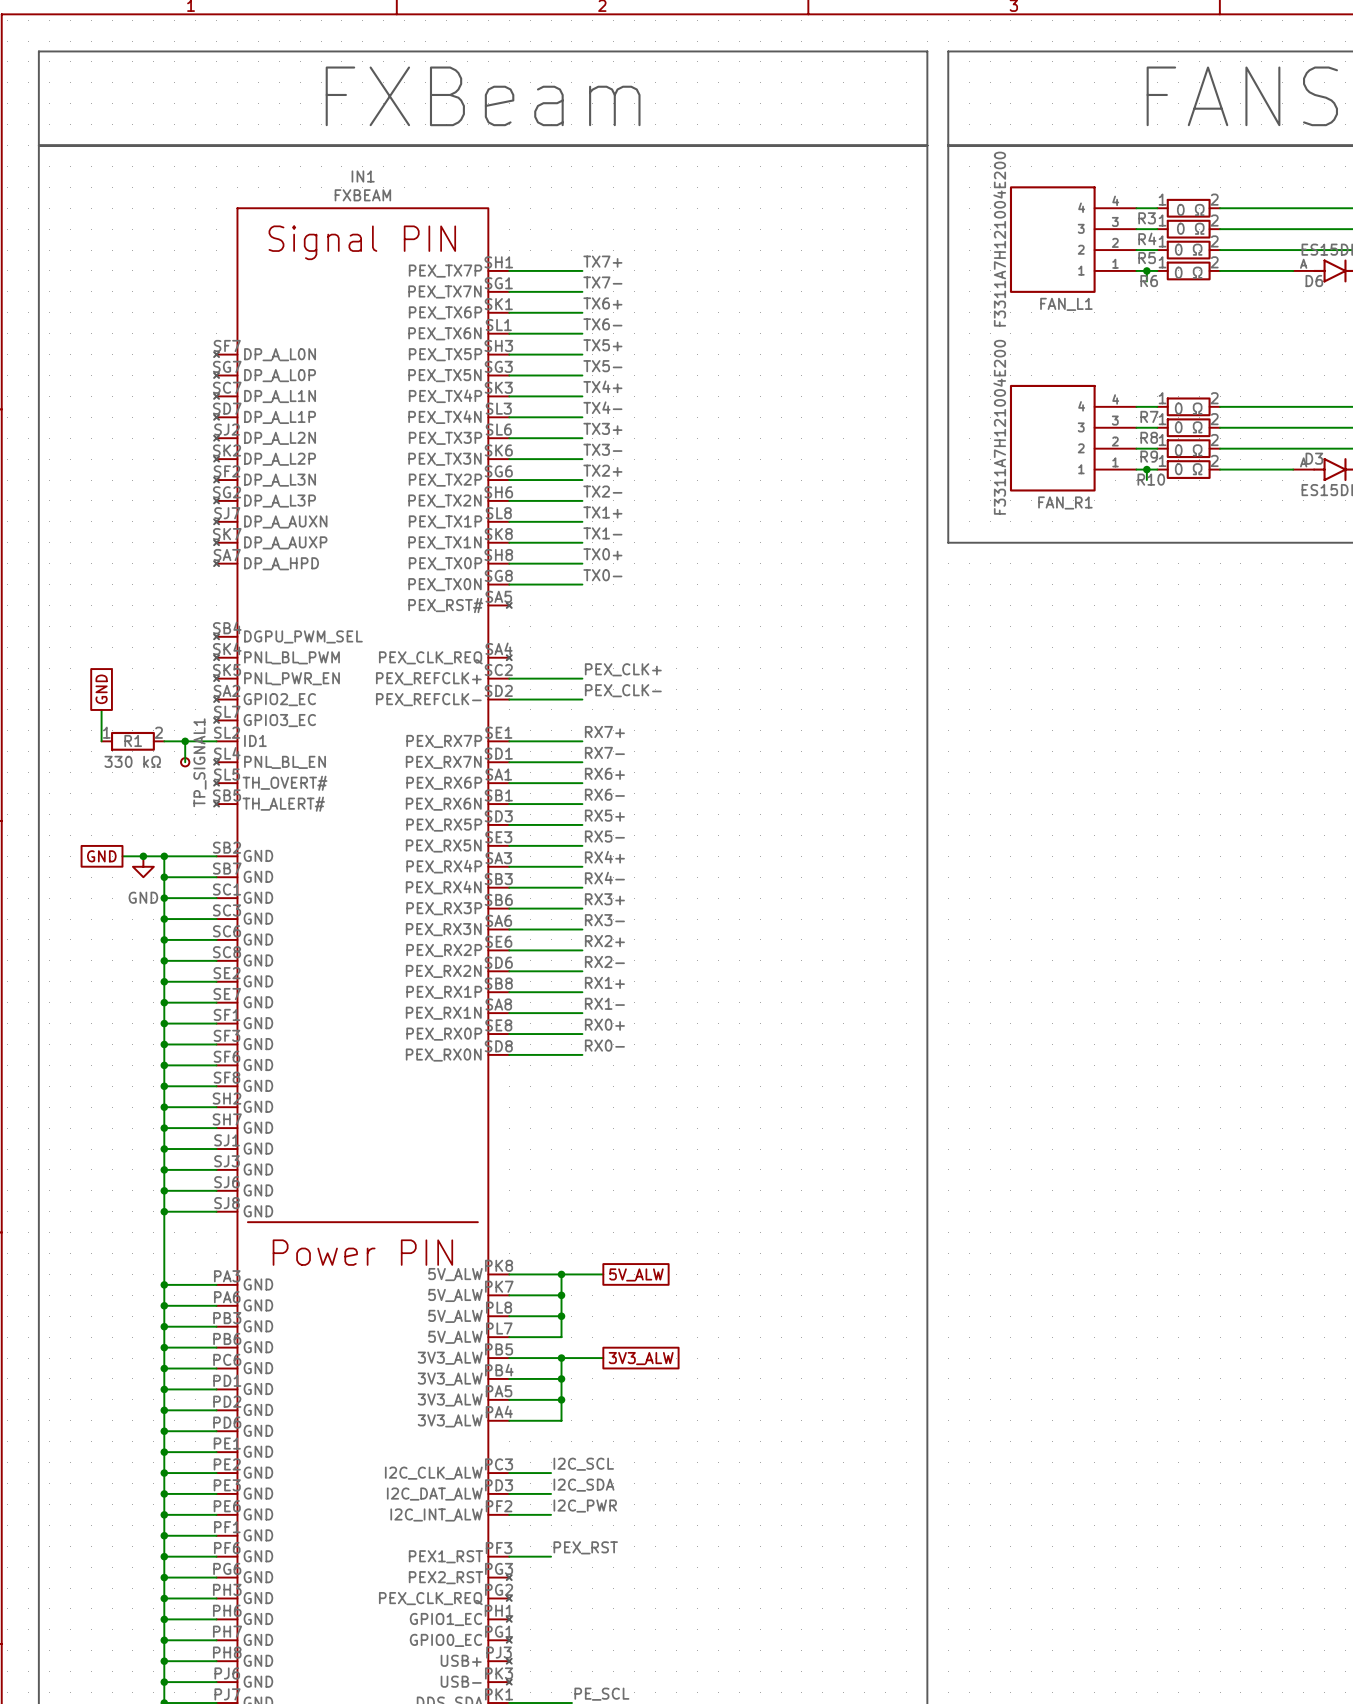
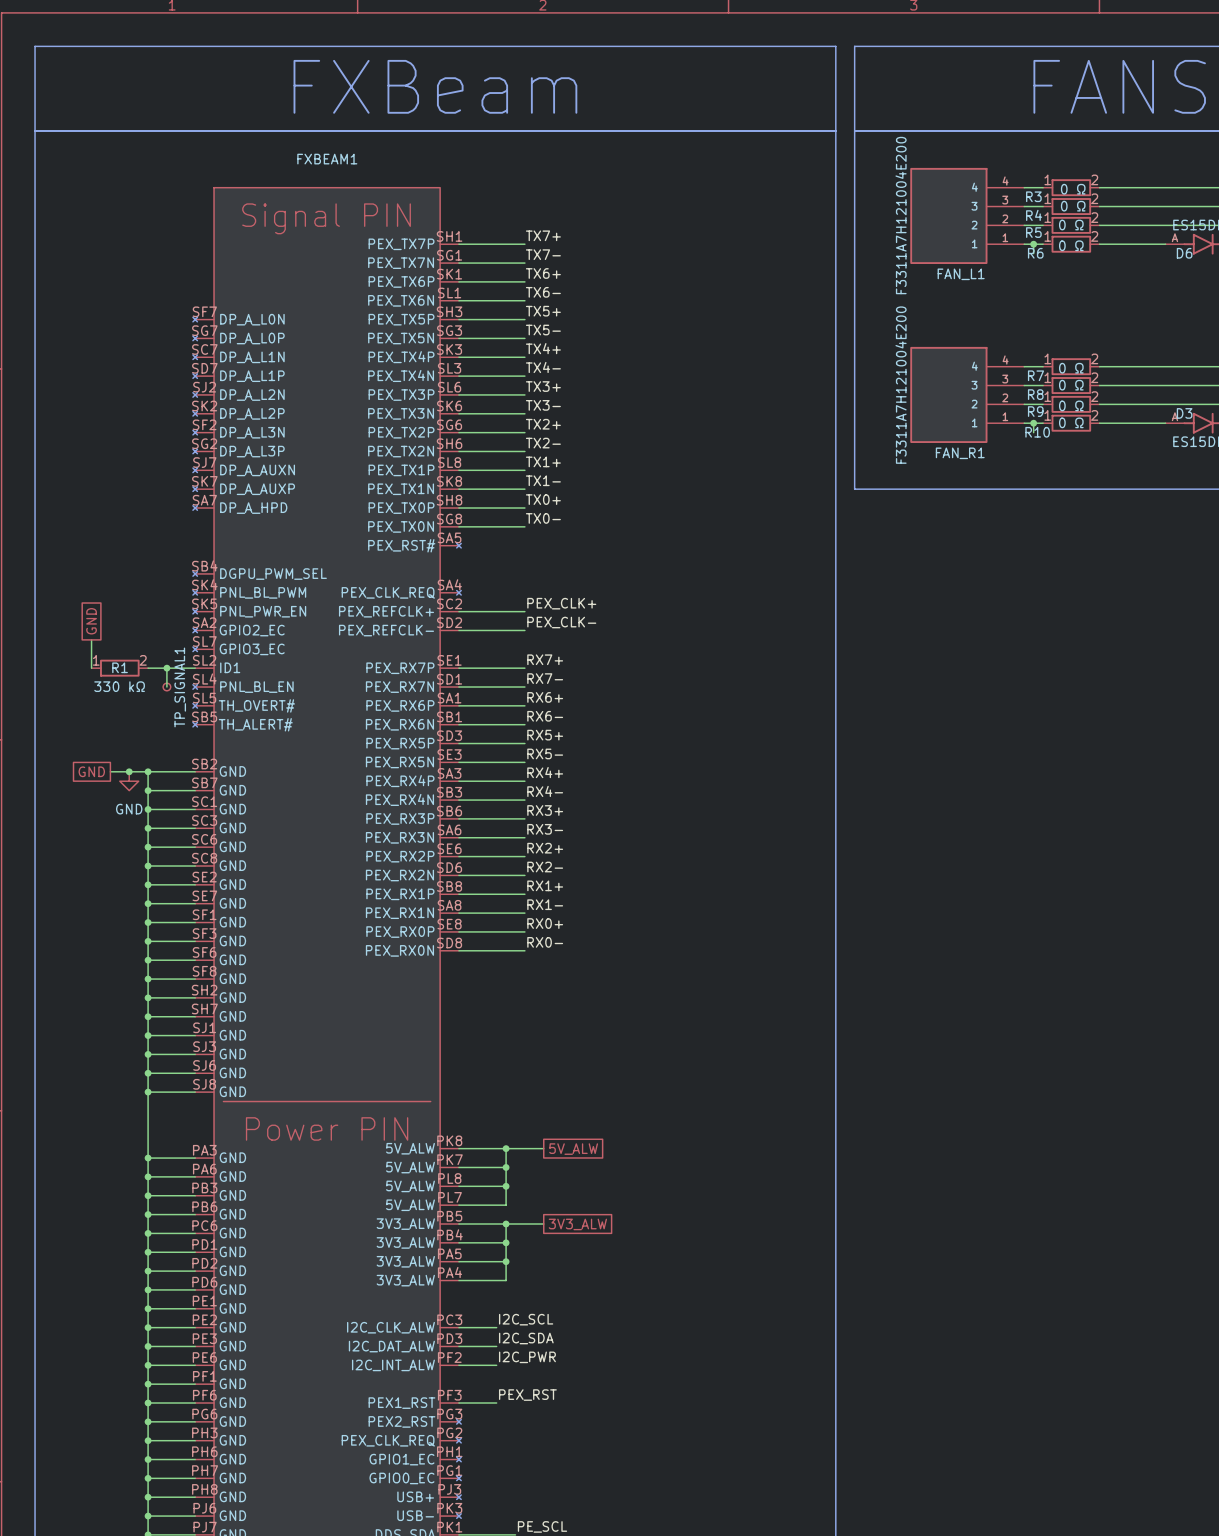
IN1 name: IN1 (363, 176) -> FXBEAM1 (327, 159)
IN1 value: FXBEAM (362, 195) -> none

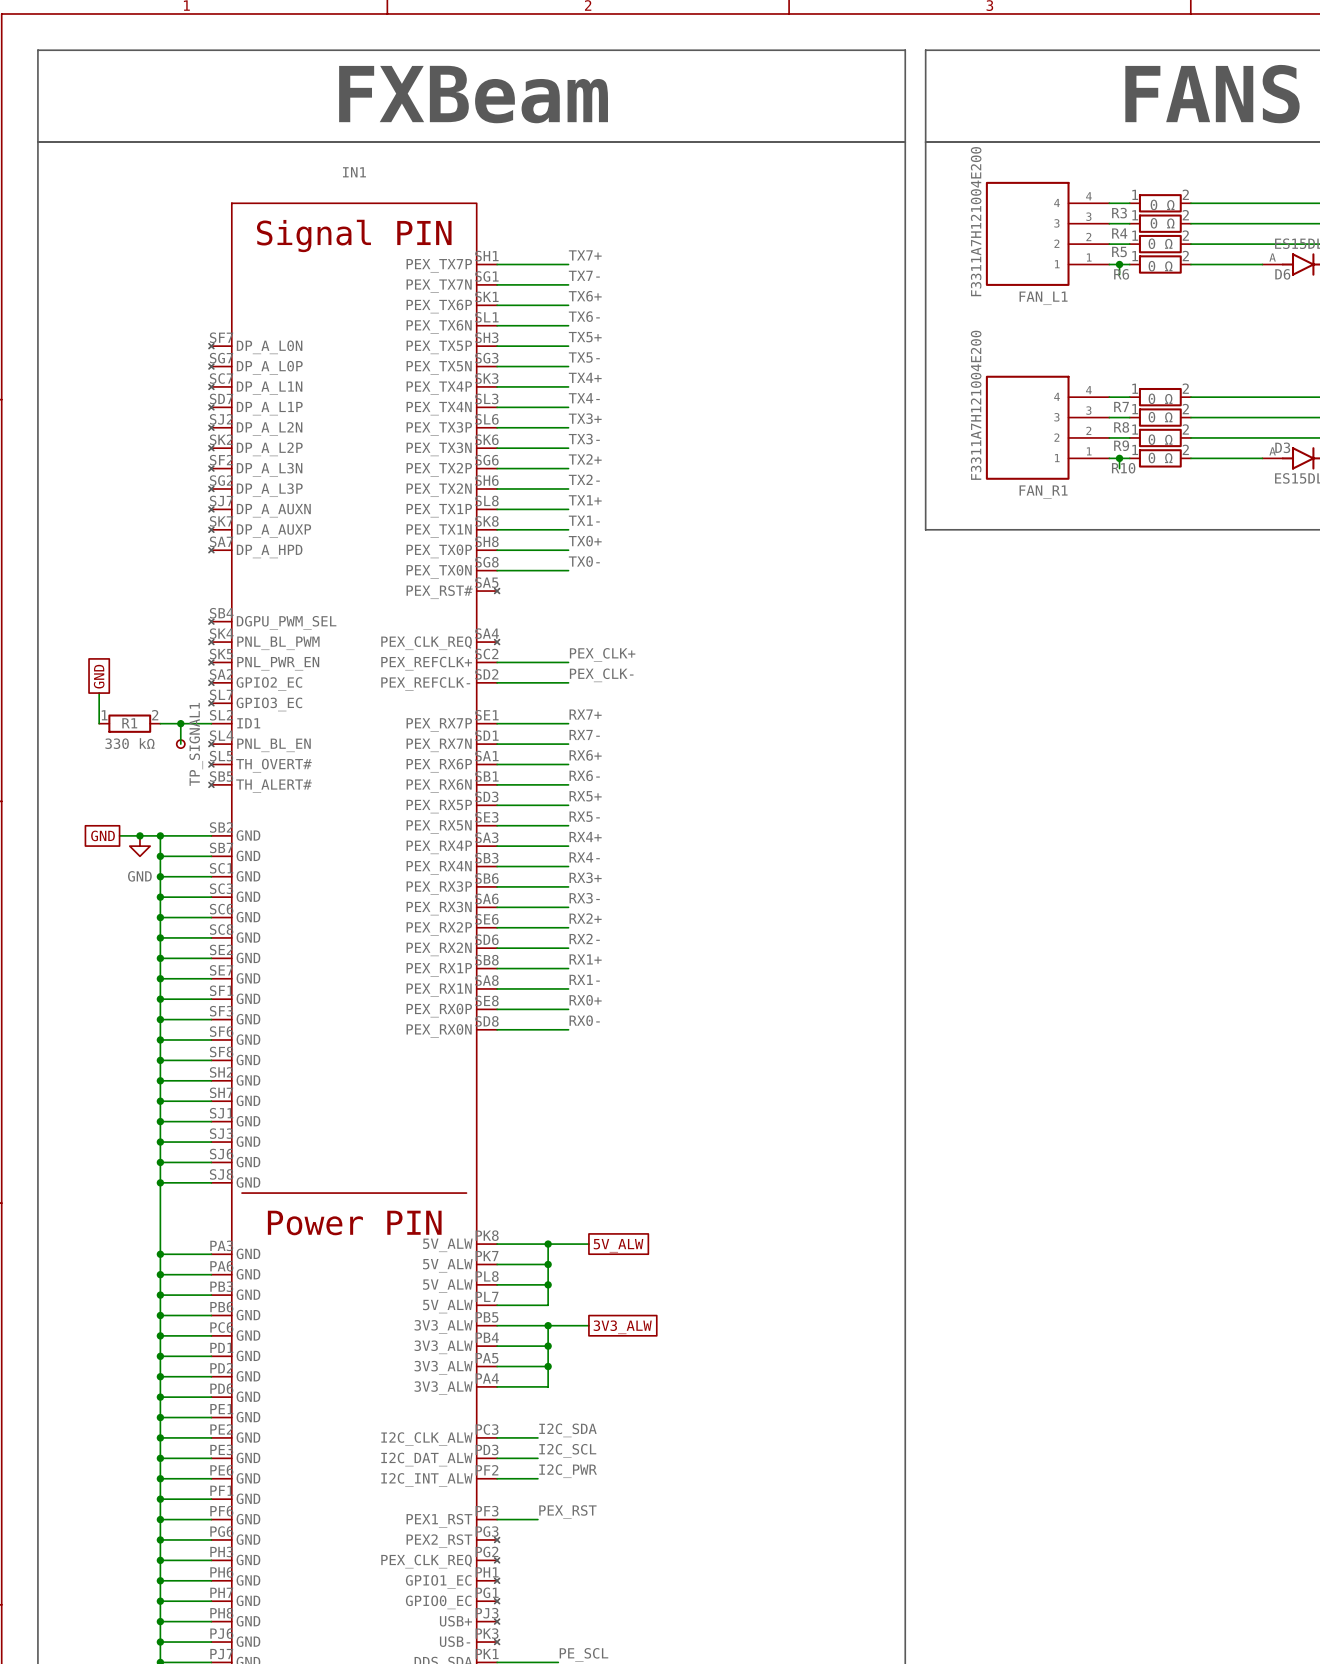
FXBEAM1 name: FXBEAM1 (327, 159) -> IN1 (354, 172)
label: I2C_SCL (526, 1319) -> I2C_SDA (567, 1430)
label: I2C_SDA (526, 1338) -> I2C_SCL (567, 1450)

